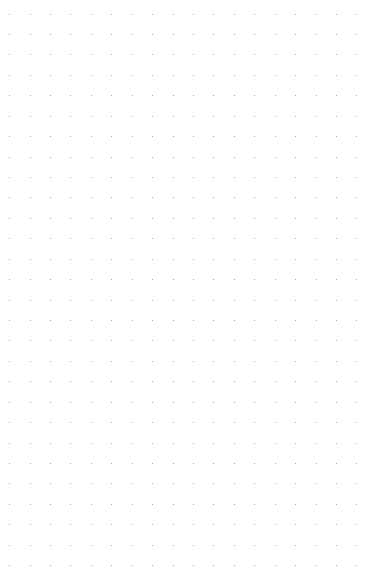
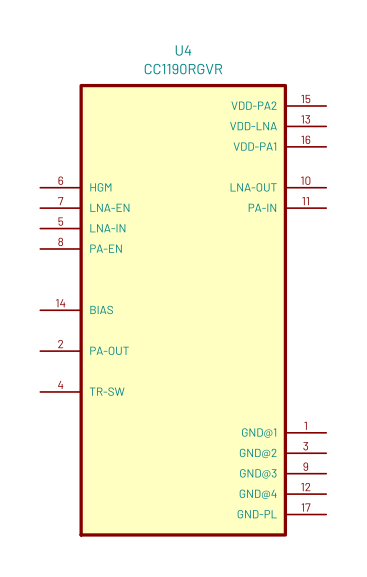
U4: none -> CC1190RGVR (183, 310)

